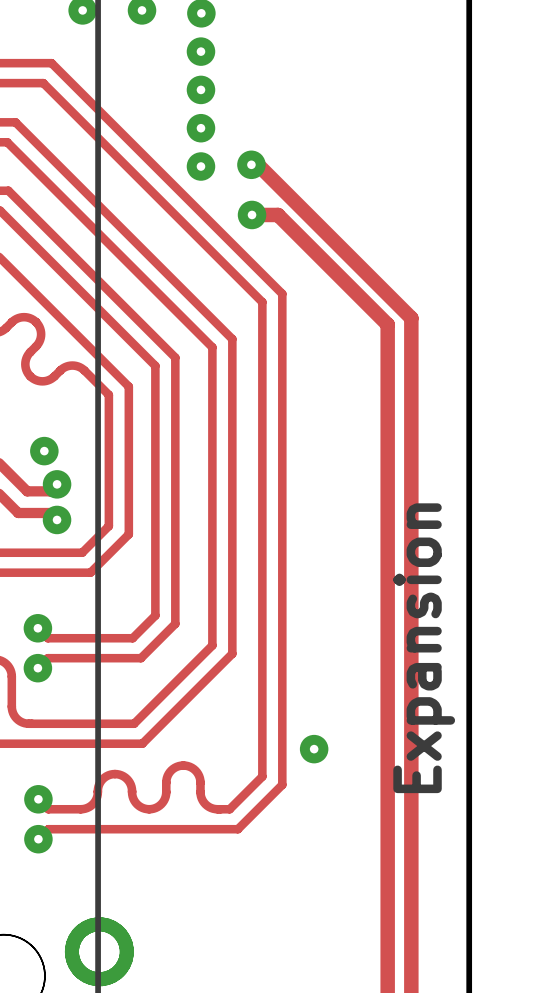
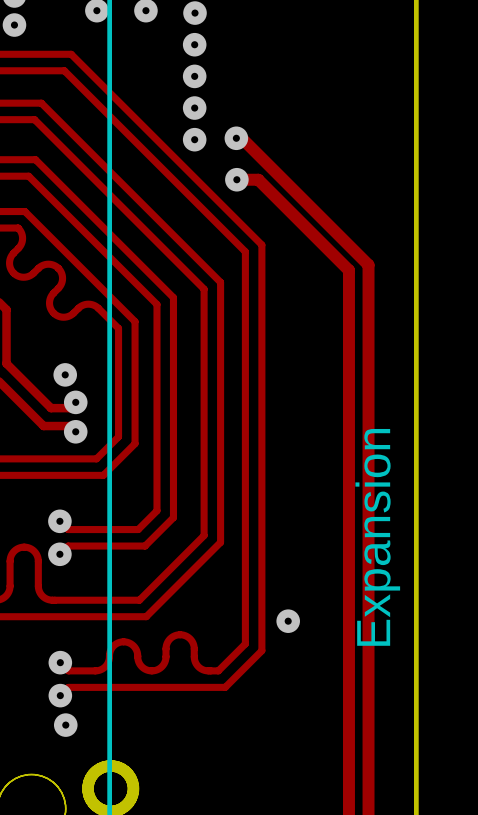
via: none -> (65, 725)

